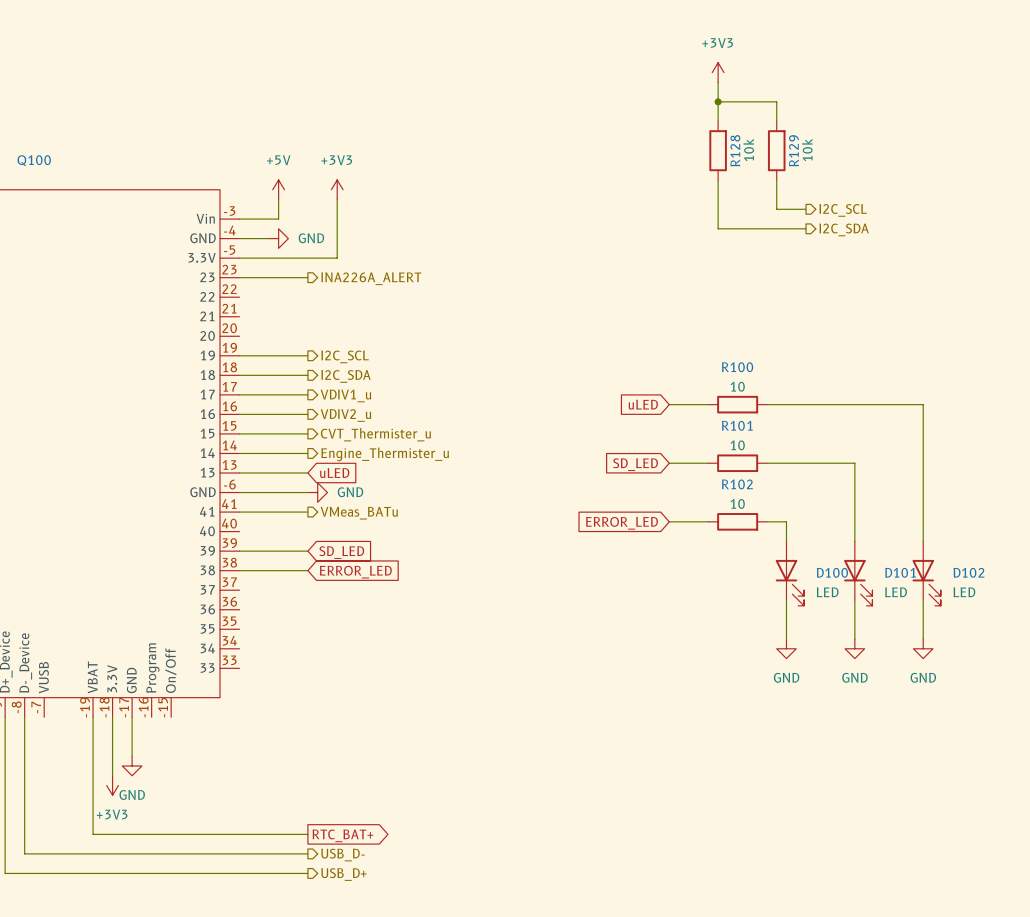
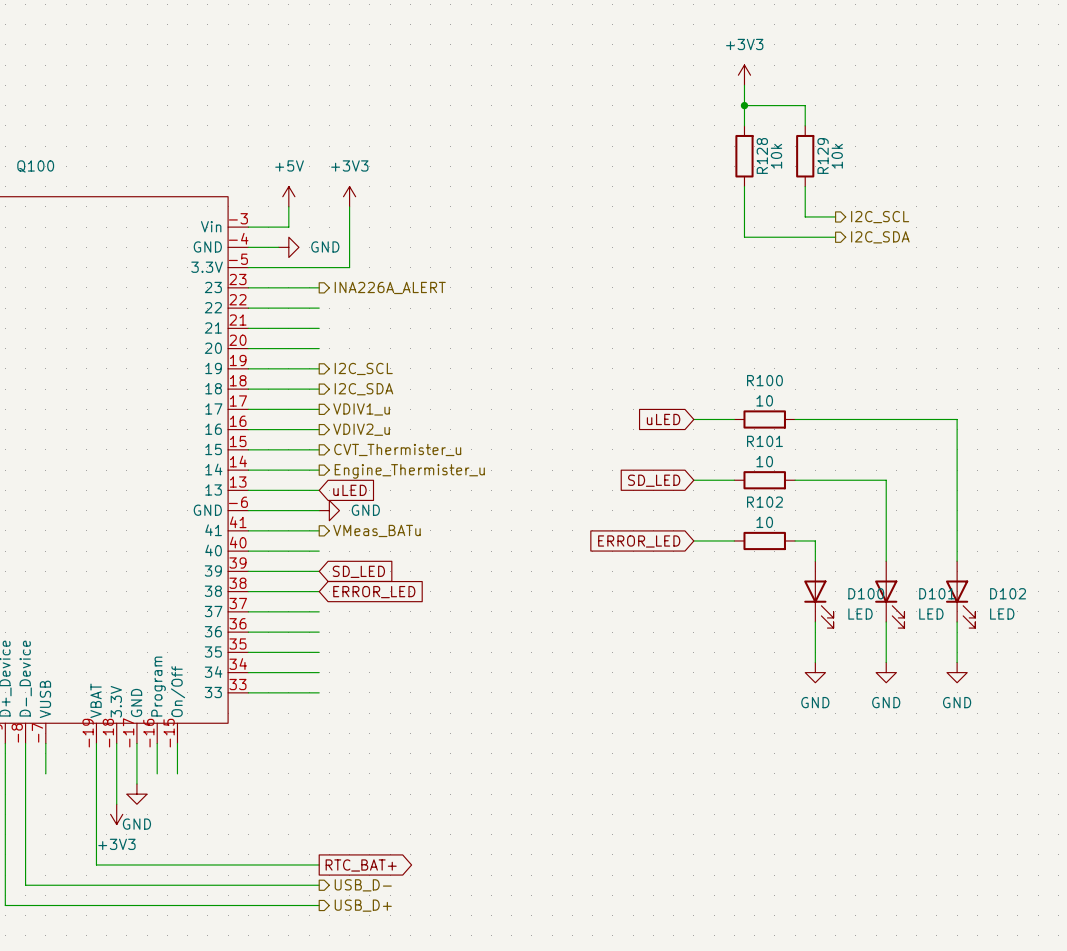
wire: none -> (248, 308) (319, 308)
wire: none -> (248, 328) (319, 328)
wire: none -> (248, 348) (319, 348)
wire: none -> (248, 551) (319, 551)
wire: none -> (248, 611) (319, 611)
wire: none -> (248, 632) (319, 632)
wire: none -> (248, 652) (319, 652)
wire: none -> (248, 672) (319, 672)
wire: none -> (248, 692) (319, 692)
wire: none -> (45, 743) (45, 773)
wire: none -> (157, 743) (157, 773)
wire: none -> (177, 743) (177, 773)

